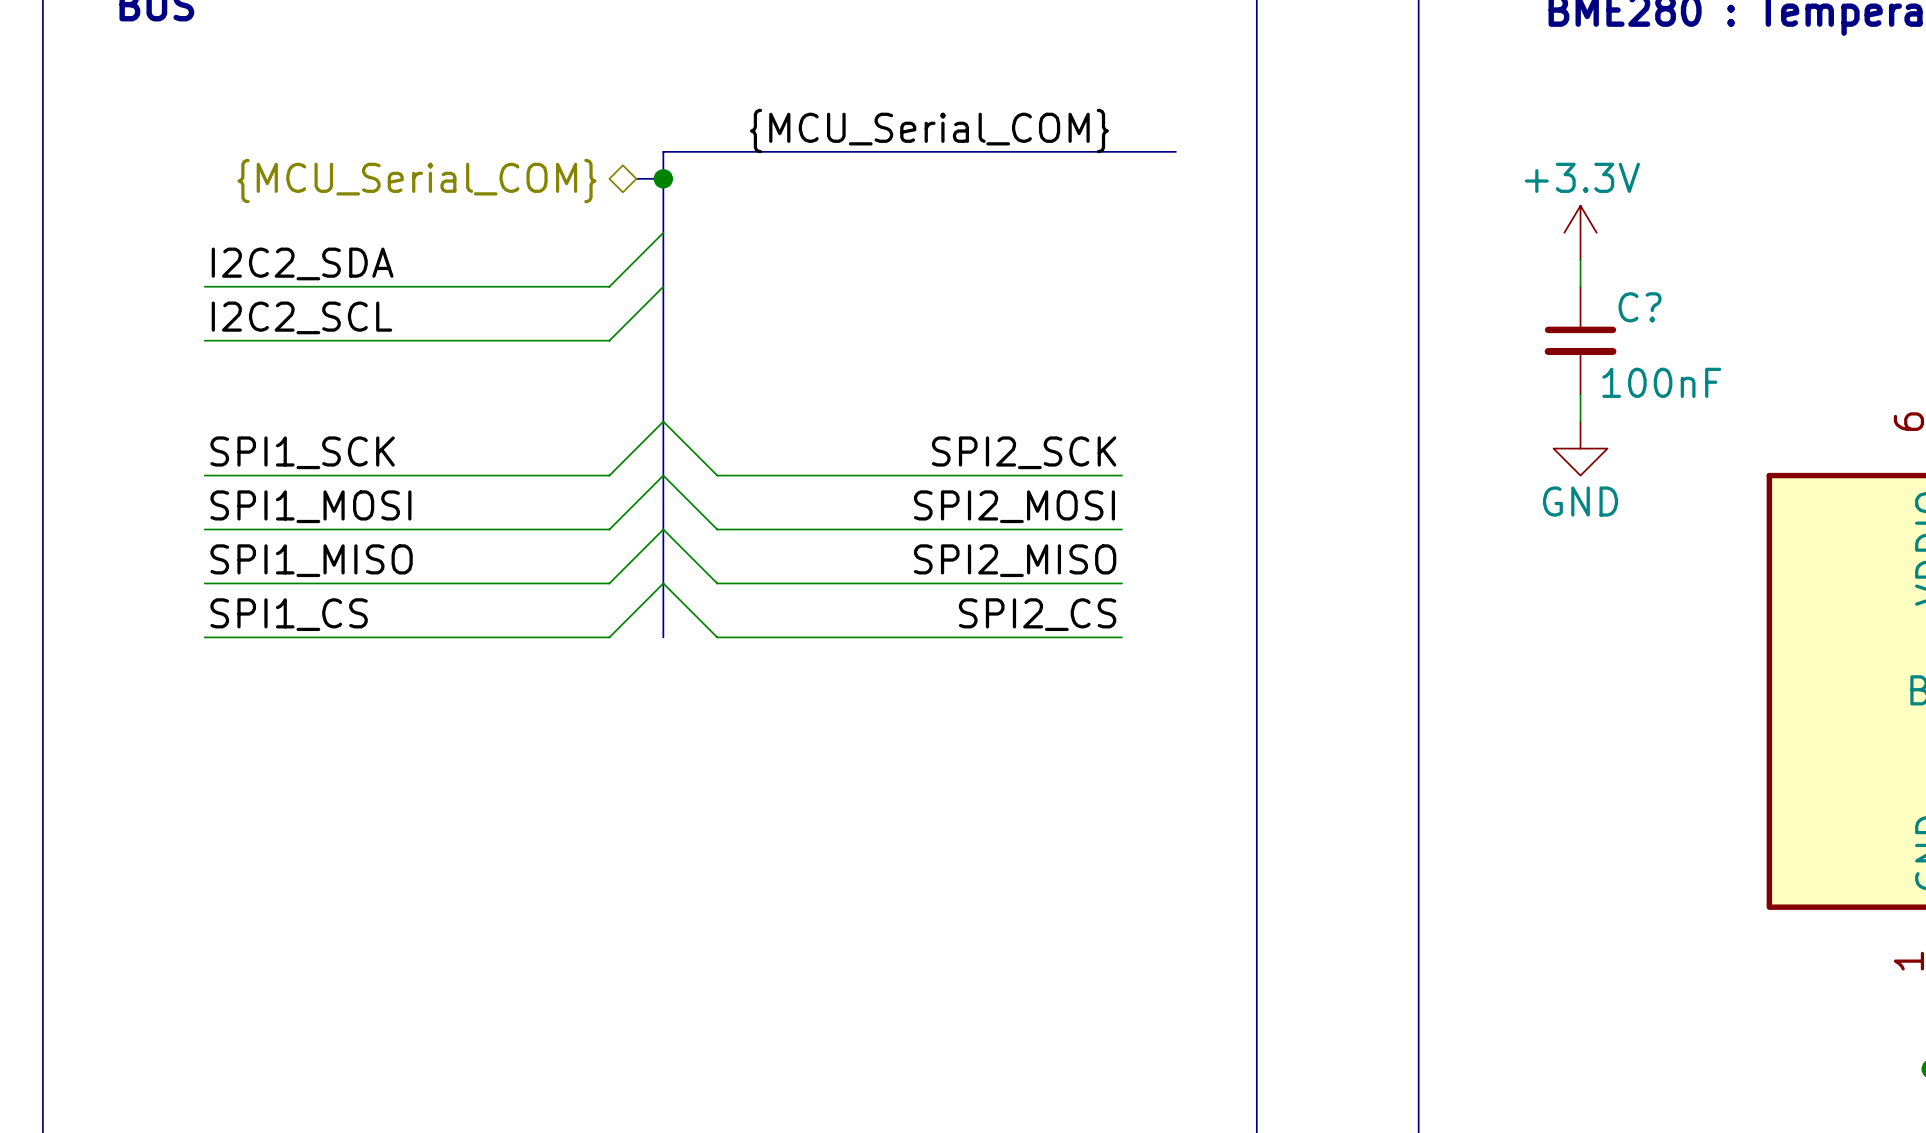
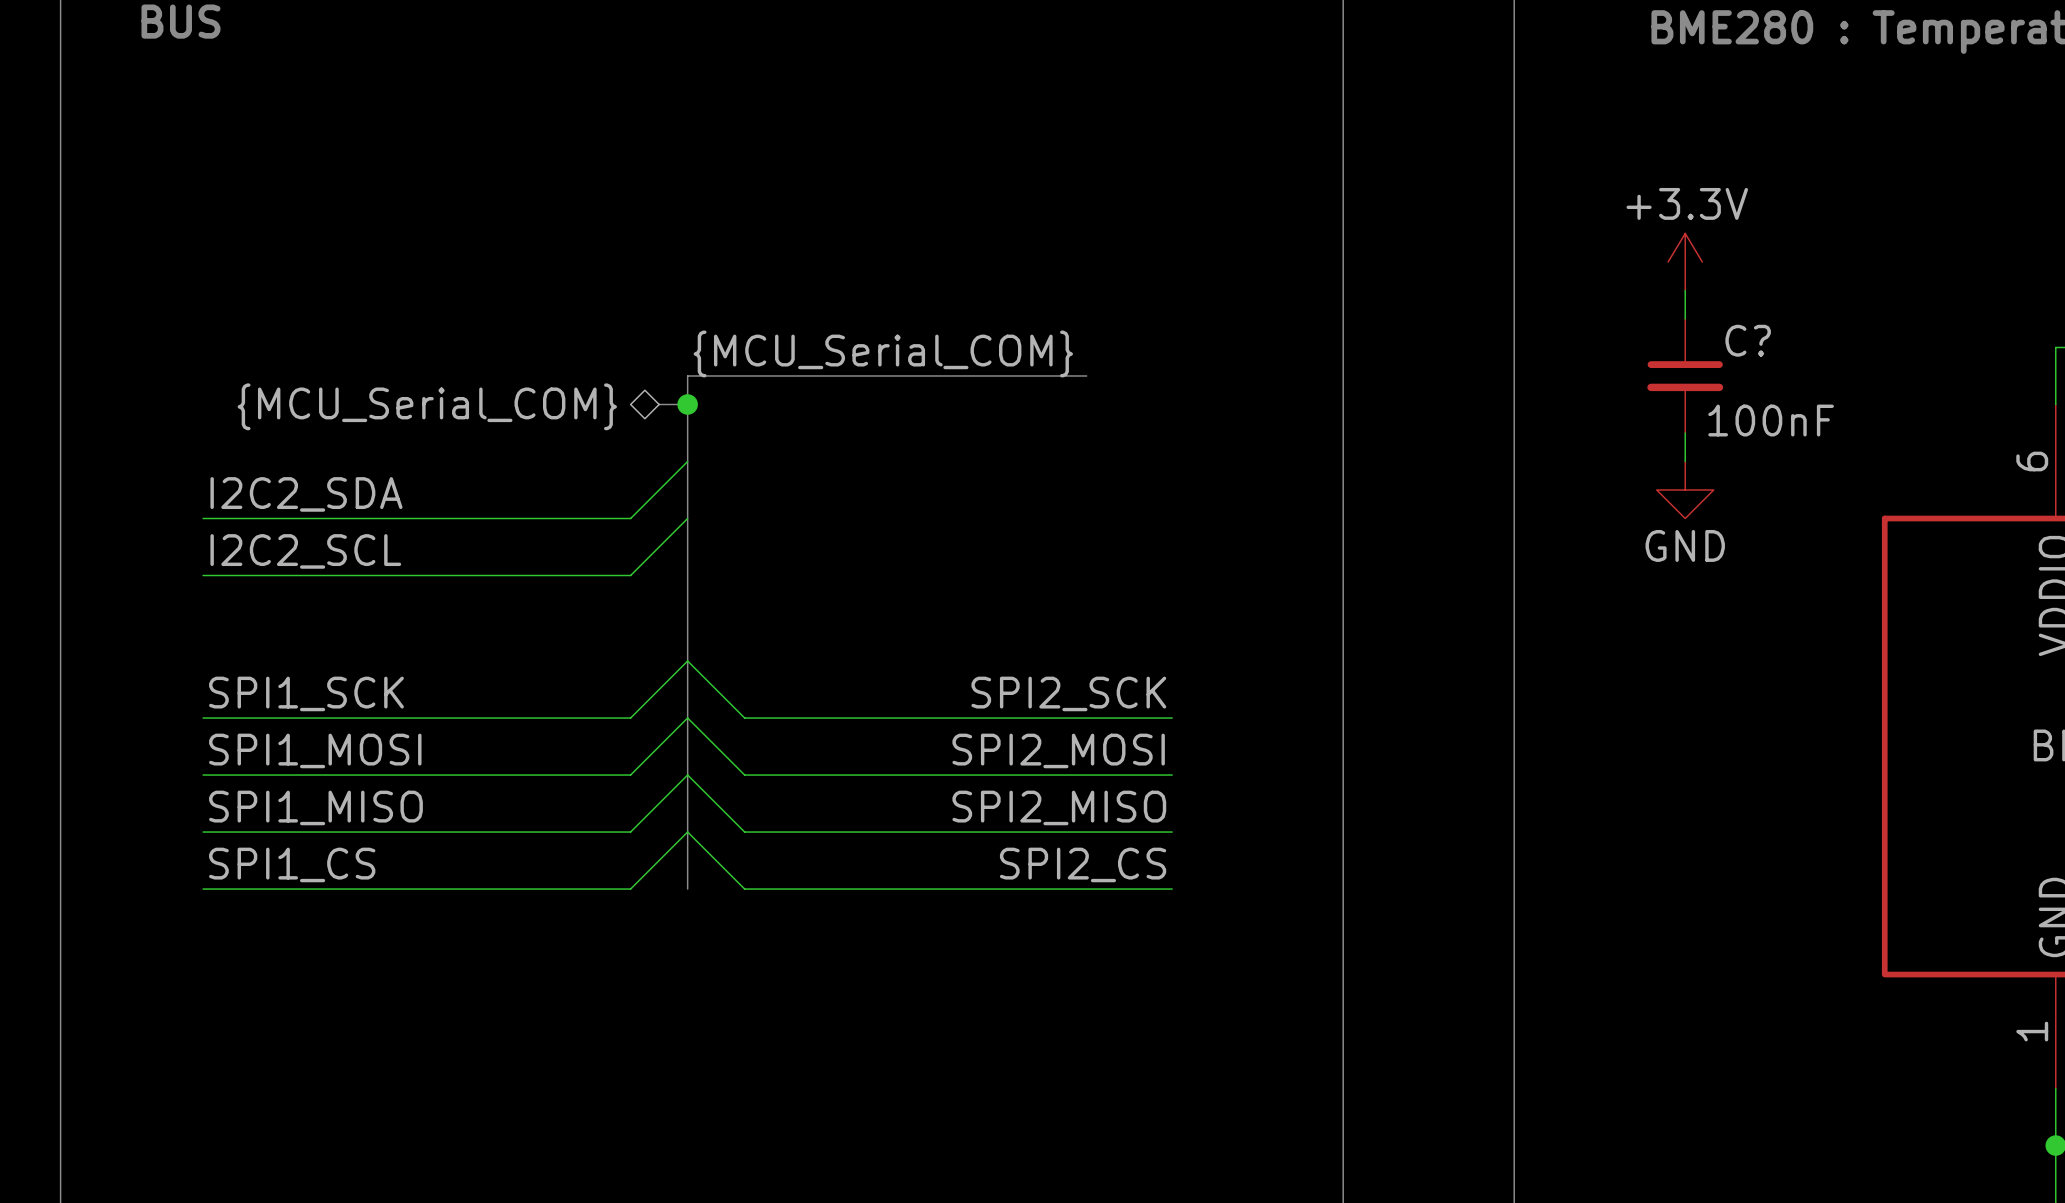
label position: {MCU_Serial_COM} (929, 130) -> {MCU_Serial_COM} (883, 353)
bus: (1175, 151) (663, 151) (663, 637) -> none
bus: (636, 178) (663, 178) -> (659, 404) (687, 404)
junction: (663, 178) -> none
hierarchical label position: {MCU_Serial_COM} (416, 181) -> {MCU_Serial_COM} (427, 406)
wire: (663, 232) (609, 286) (204, 286) -> none
label position: I2C2_SDA (302, 263) -> I2C2_SDA (306, 494)
wire: (663, 286) (609, 340) (204, 340) -> none
label position: I2C2_SCL (301, 317) -> I2C2_SCL (305, 551)
bus: none -> (1086, 375) (687, 375) (687, 889)
junction: none -> (687, 404)
label position: SPI1_SCK (302, 452) -> SPI1_SCK (306, 693)
label position: SPI2_SCK (1024, 452) -> SPI2_SCK (1068, 693)
wire: none -> (203, 518) (231, 518)
wire: (582, 475) (609, 475) (663, 421) (717, 475) (1121, 475) -> (630, 518) (687, 461)
label position: SPI1_MOSI (310, 506) -> SPI1_MOSI (315, 750)
label position: SPI2_MOSI (1014, 506) -> SPI2_MOSI (1058, 750)
wire: none -> (203, 575) (231, 575)
wire: (582, 529) (609, 529) (663, 475) (717, 529) (1121, 529) -> (630, 575) (687, 518)
label position: SPI1_MISO (311, 560) -> SPI1_MISO (315, 807)
label position: SPI2_MISO (1015, 560) -> SPI2_MISO (1059, 807)
wire: (204, 583) (609, 583) (663, 529) (717, 583) (1121, 583) -> (203, 775) (630, 775) (687, 718) (744, 775) (1172, 775)
wire: (636, 610) (663, 583) (717, 637) (1121, 637) -> (687, 661) (744, 718) (1172, 718)
label position: SPI1_CS (289, 614) -> SPI1_CS (292, 864)
label position: SPI2_CS (1037, 614) -> SPI2_CS (1083, 864)
wire: (204, 637) (609, 637) -> (203, 718) (630, 718) (659, 689)
wire: none -> (203, 832) (630, 832) (687, 775) (744, 832) (1172, 832)
wire: none -> (203, 889) (630, 889) (687, 832) (744, 889) (1172, 889)

